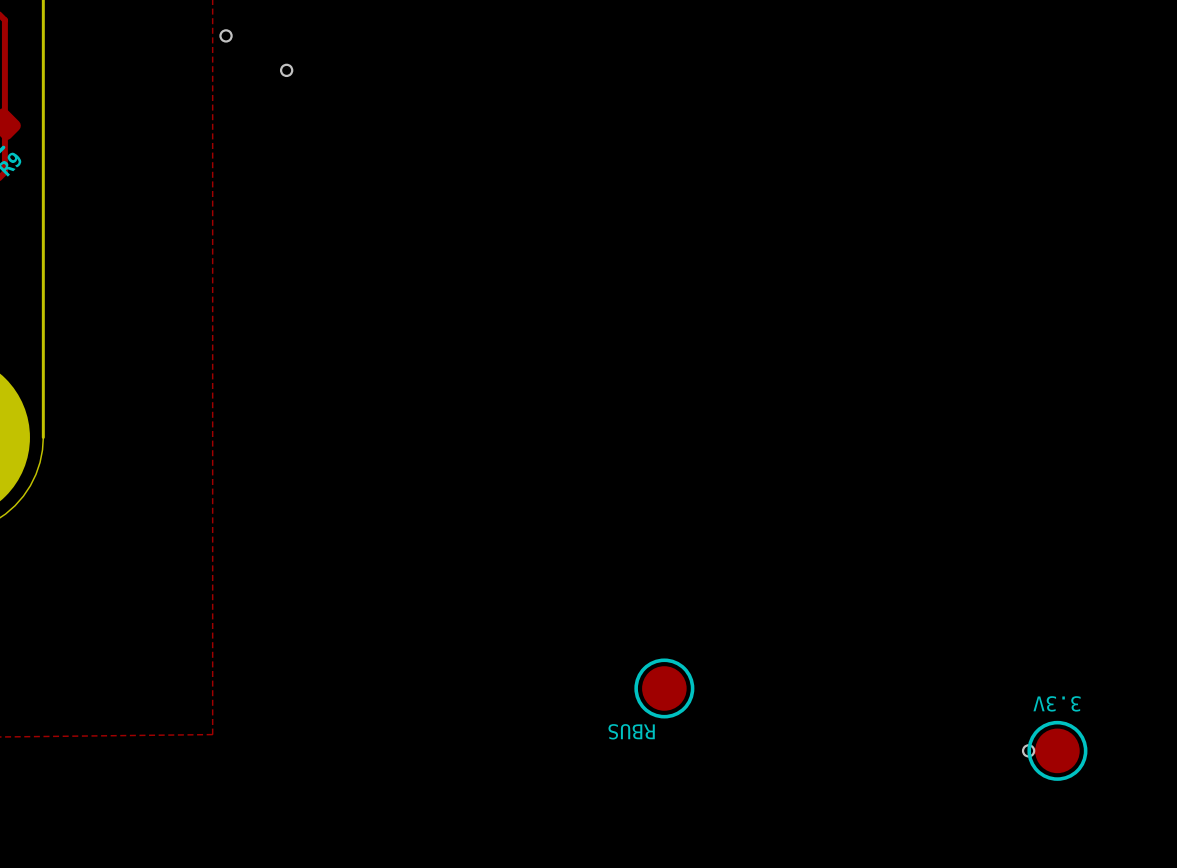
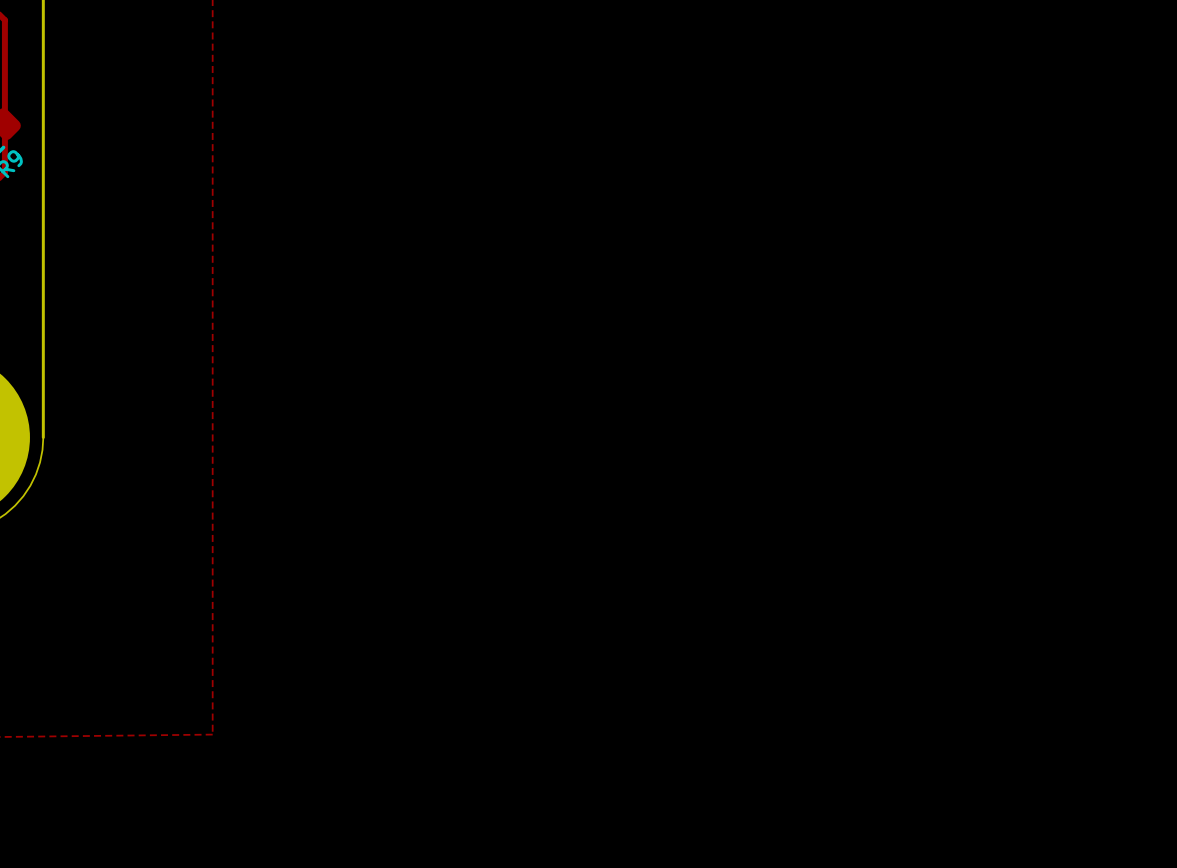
via: (226, 35) -> none
via: (286, 70) -> none
part: (664, 688) -> none
via: (1028, 750) -> none
part: (1057, 750) -> none

